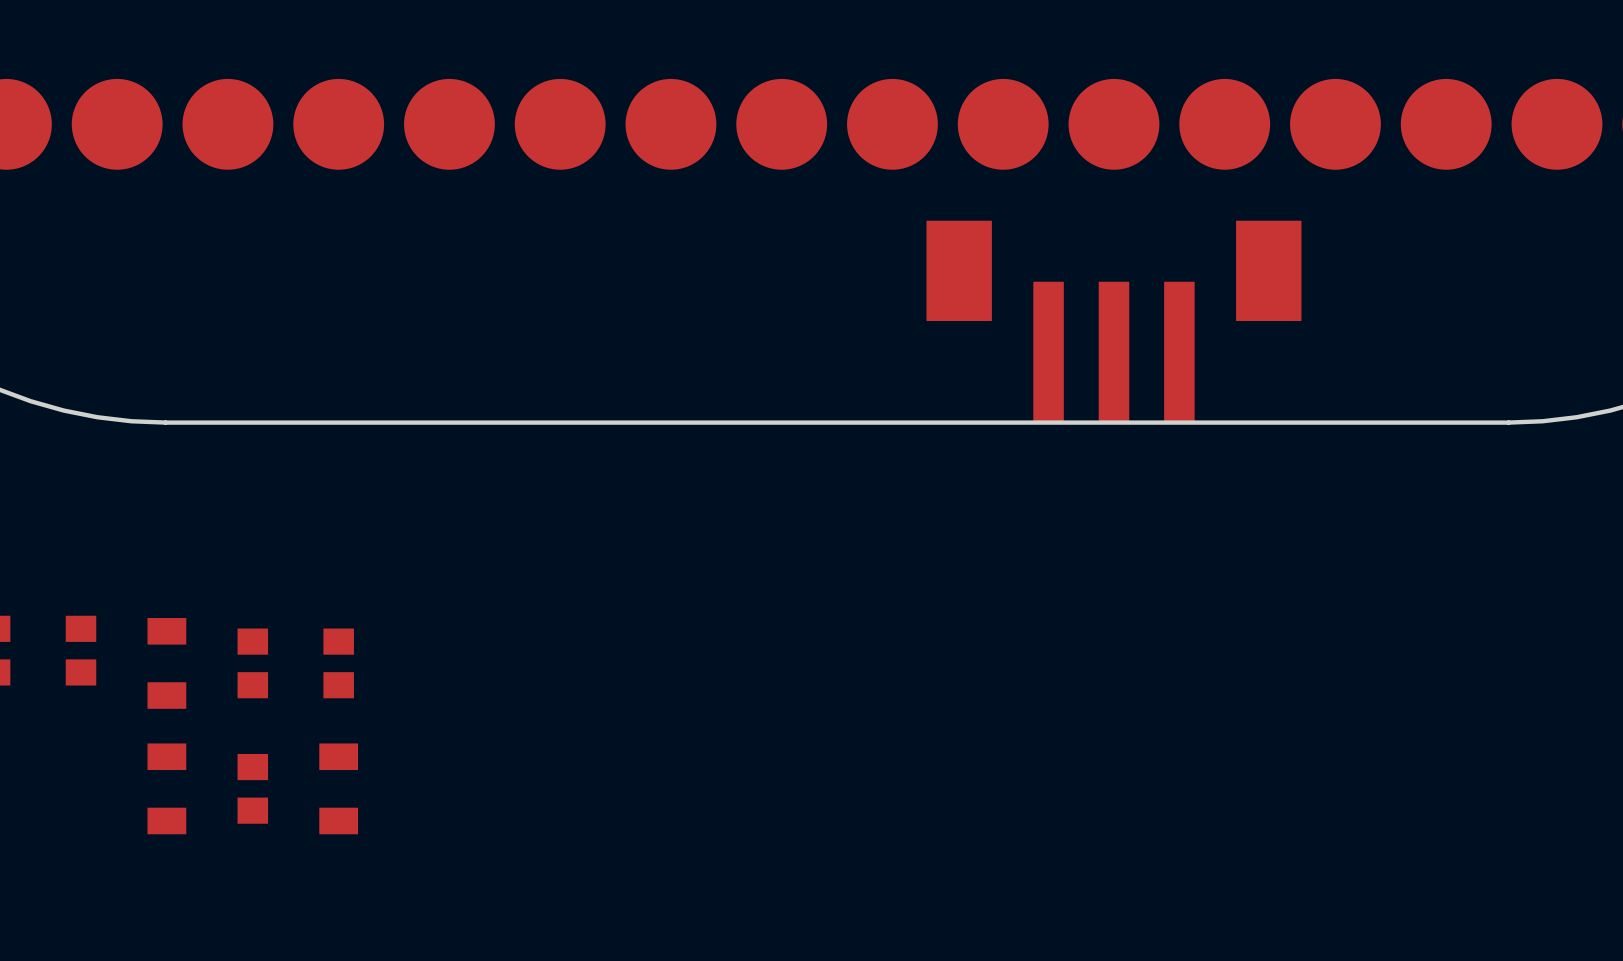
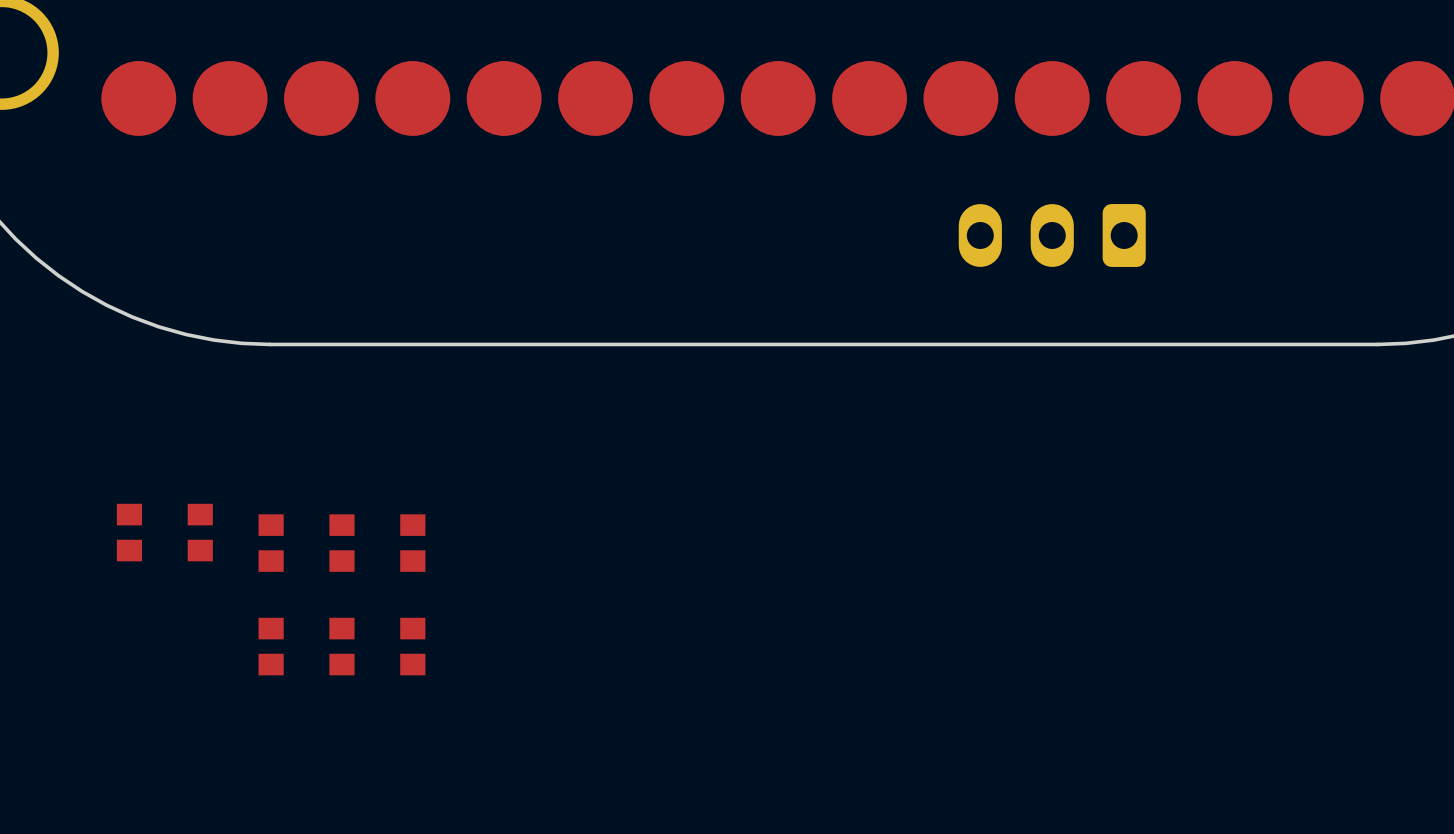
part footprint: [926, 220, 1302, 422] -> [958, 204, 1146, 267]
part footprint: [147, 618, 187, 709] -> [258, 514, 284, 572]
part footprint: [147, 743, 187, 835] -> [258, 617, 284, 676]
part footprint: [319, 743, 359, 835] -> [400, 617, 426, 676]

